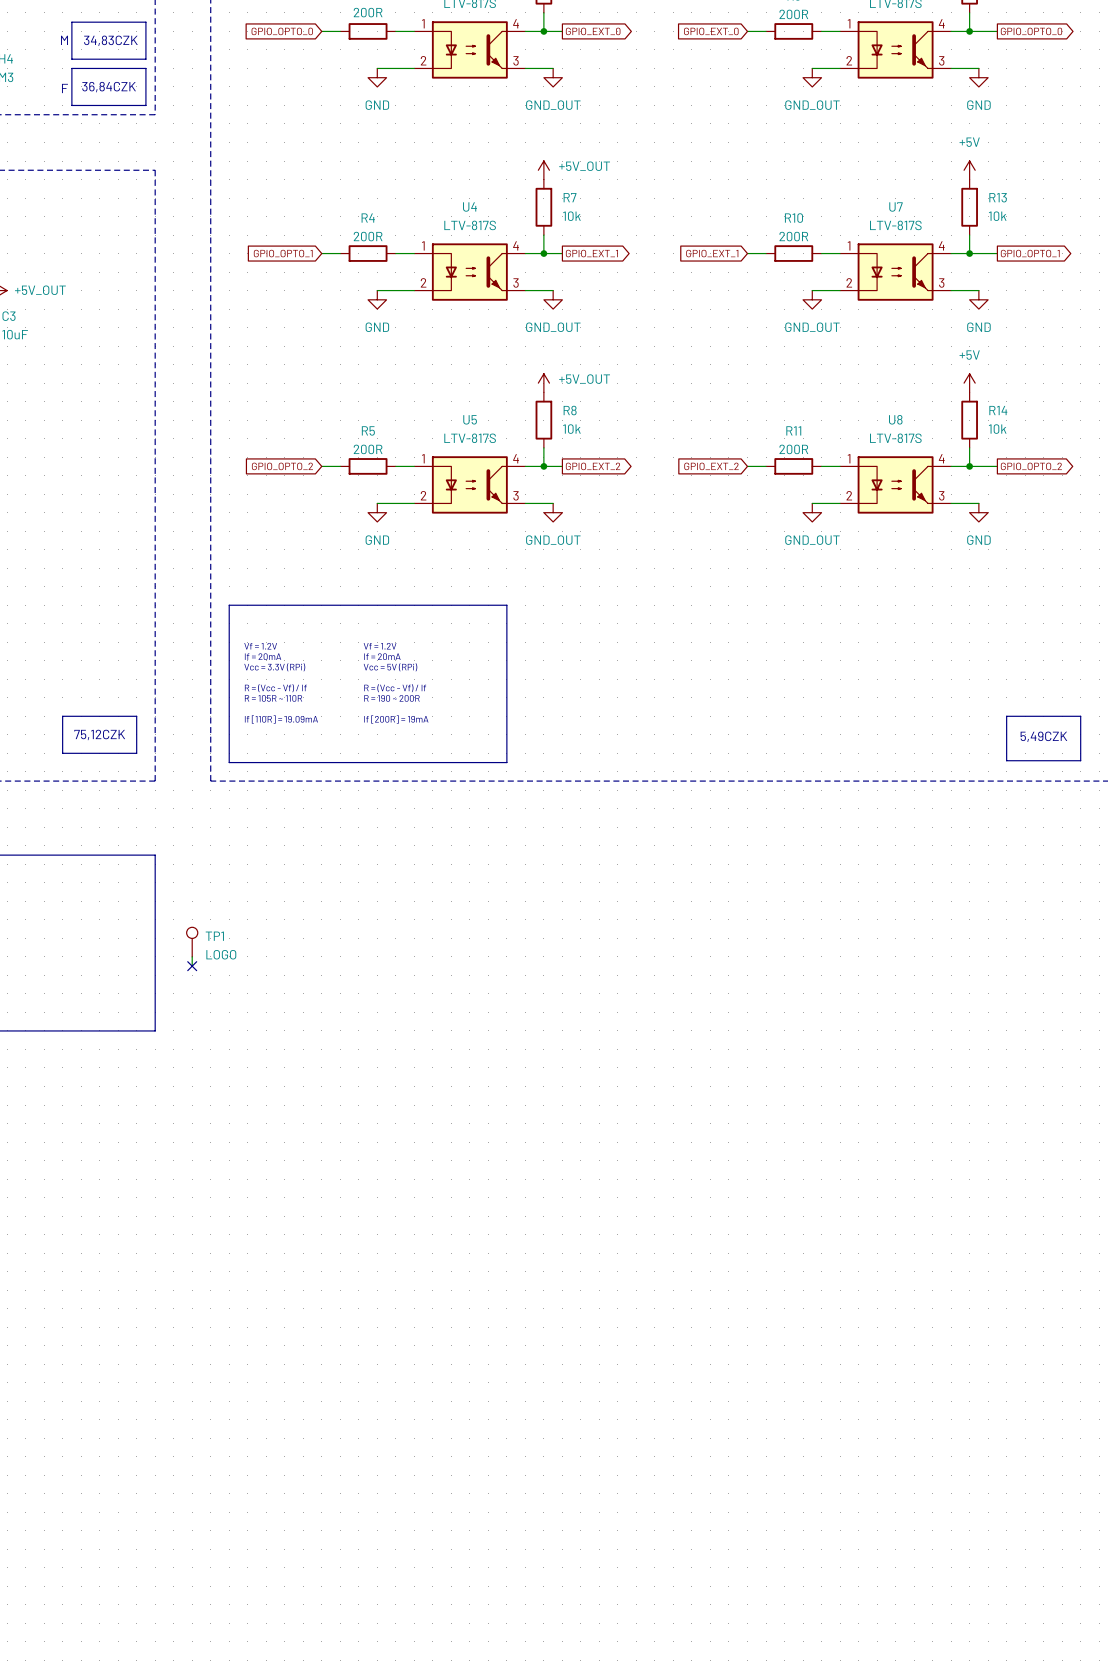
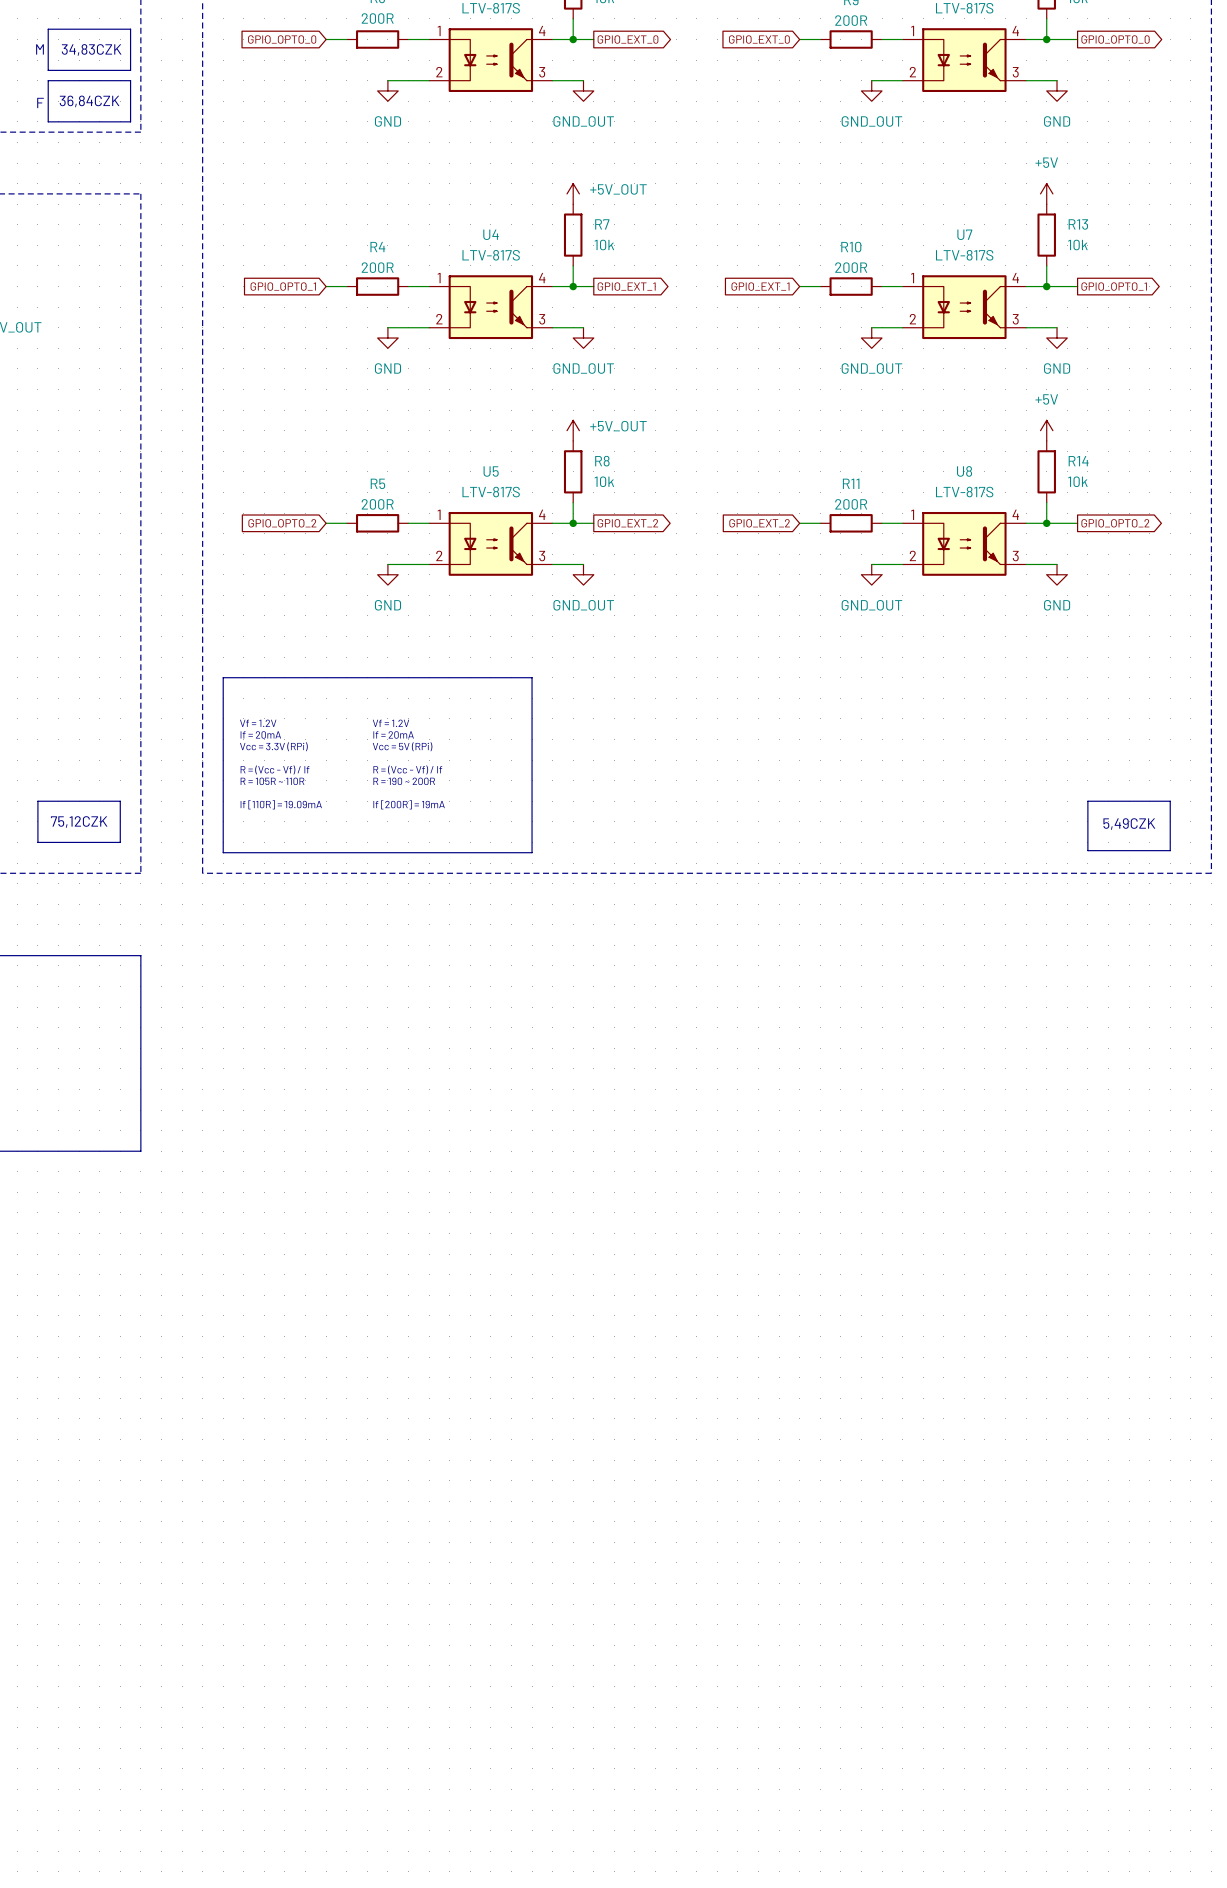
TP1: LOGO (192, 942) -> none
wire: (192, 956) (192, 966) -> none
no-connect mark: (192, 966) -> none

